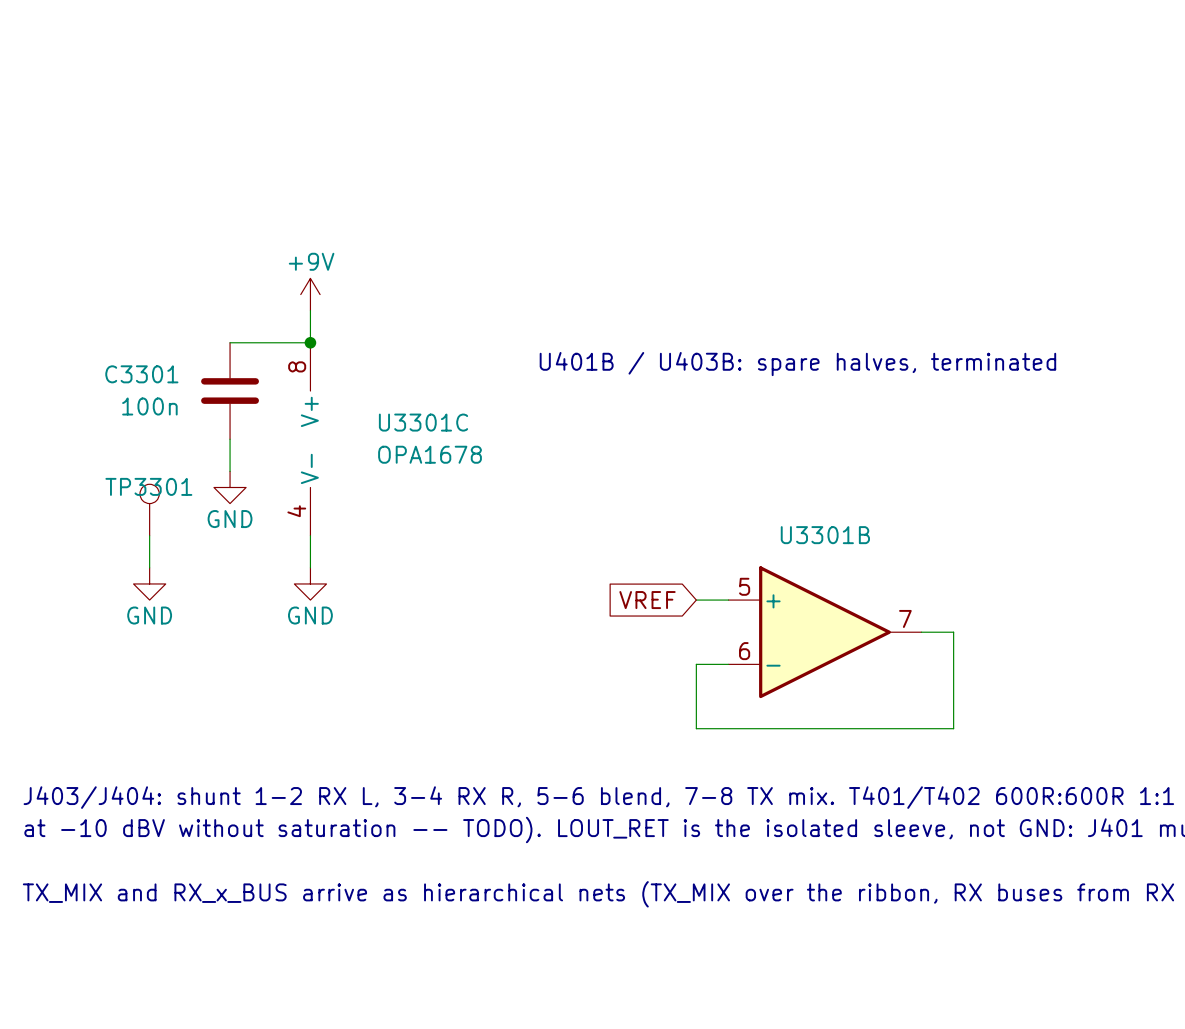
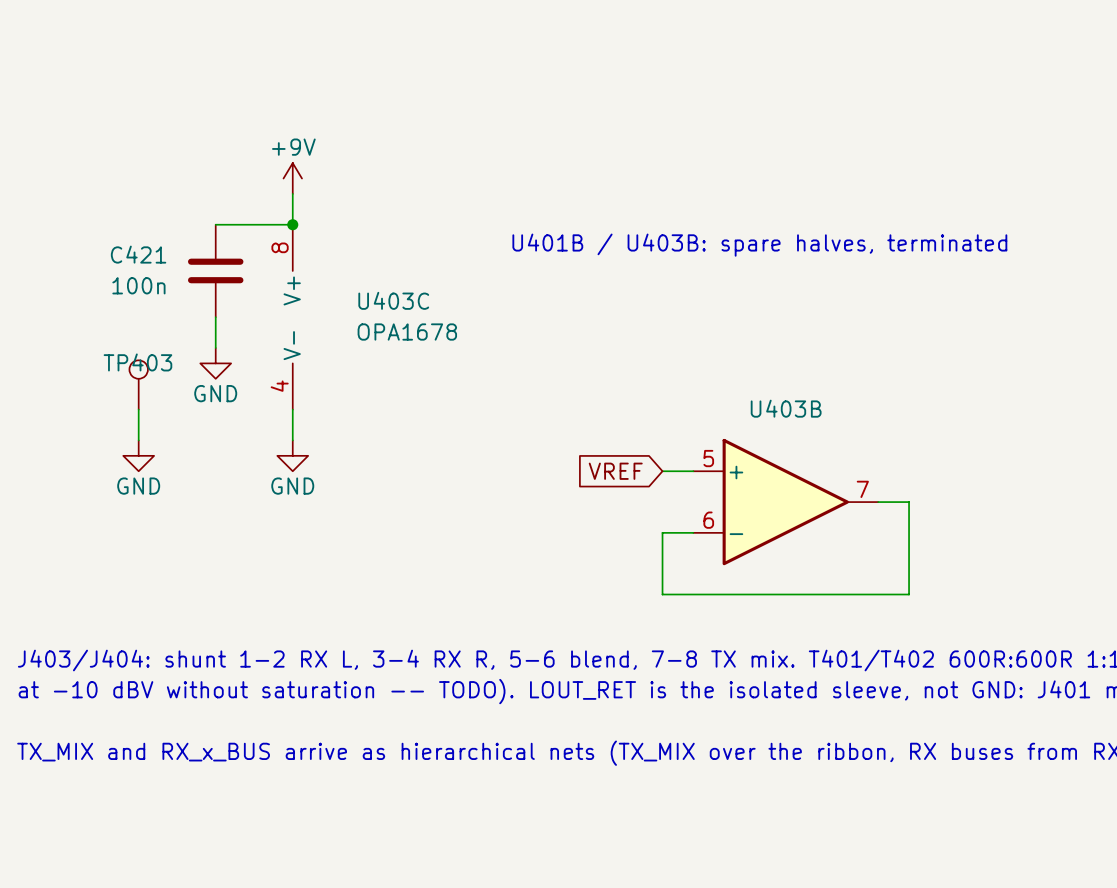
C3301 name: C3301 (141, 374) -> C421 (138, 254)
U3301C name: U3301C (423, 422) -> U403C (393, 300)
TP3301 name: TP3301 (148, 486) -> TP403 (137, 362)
U3301B name: U3301B (825, 535) -> U403B (786, 408)

